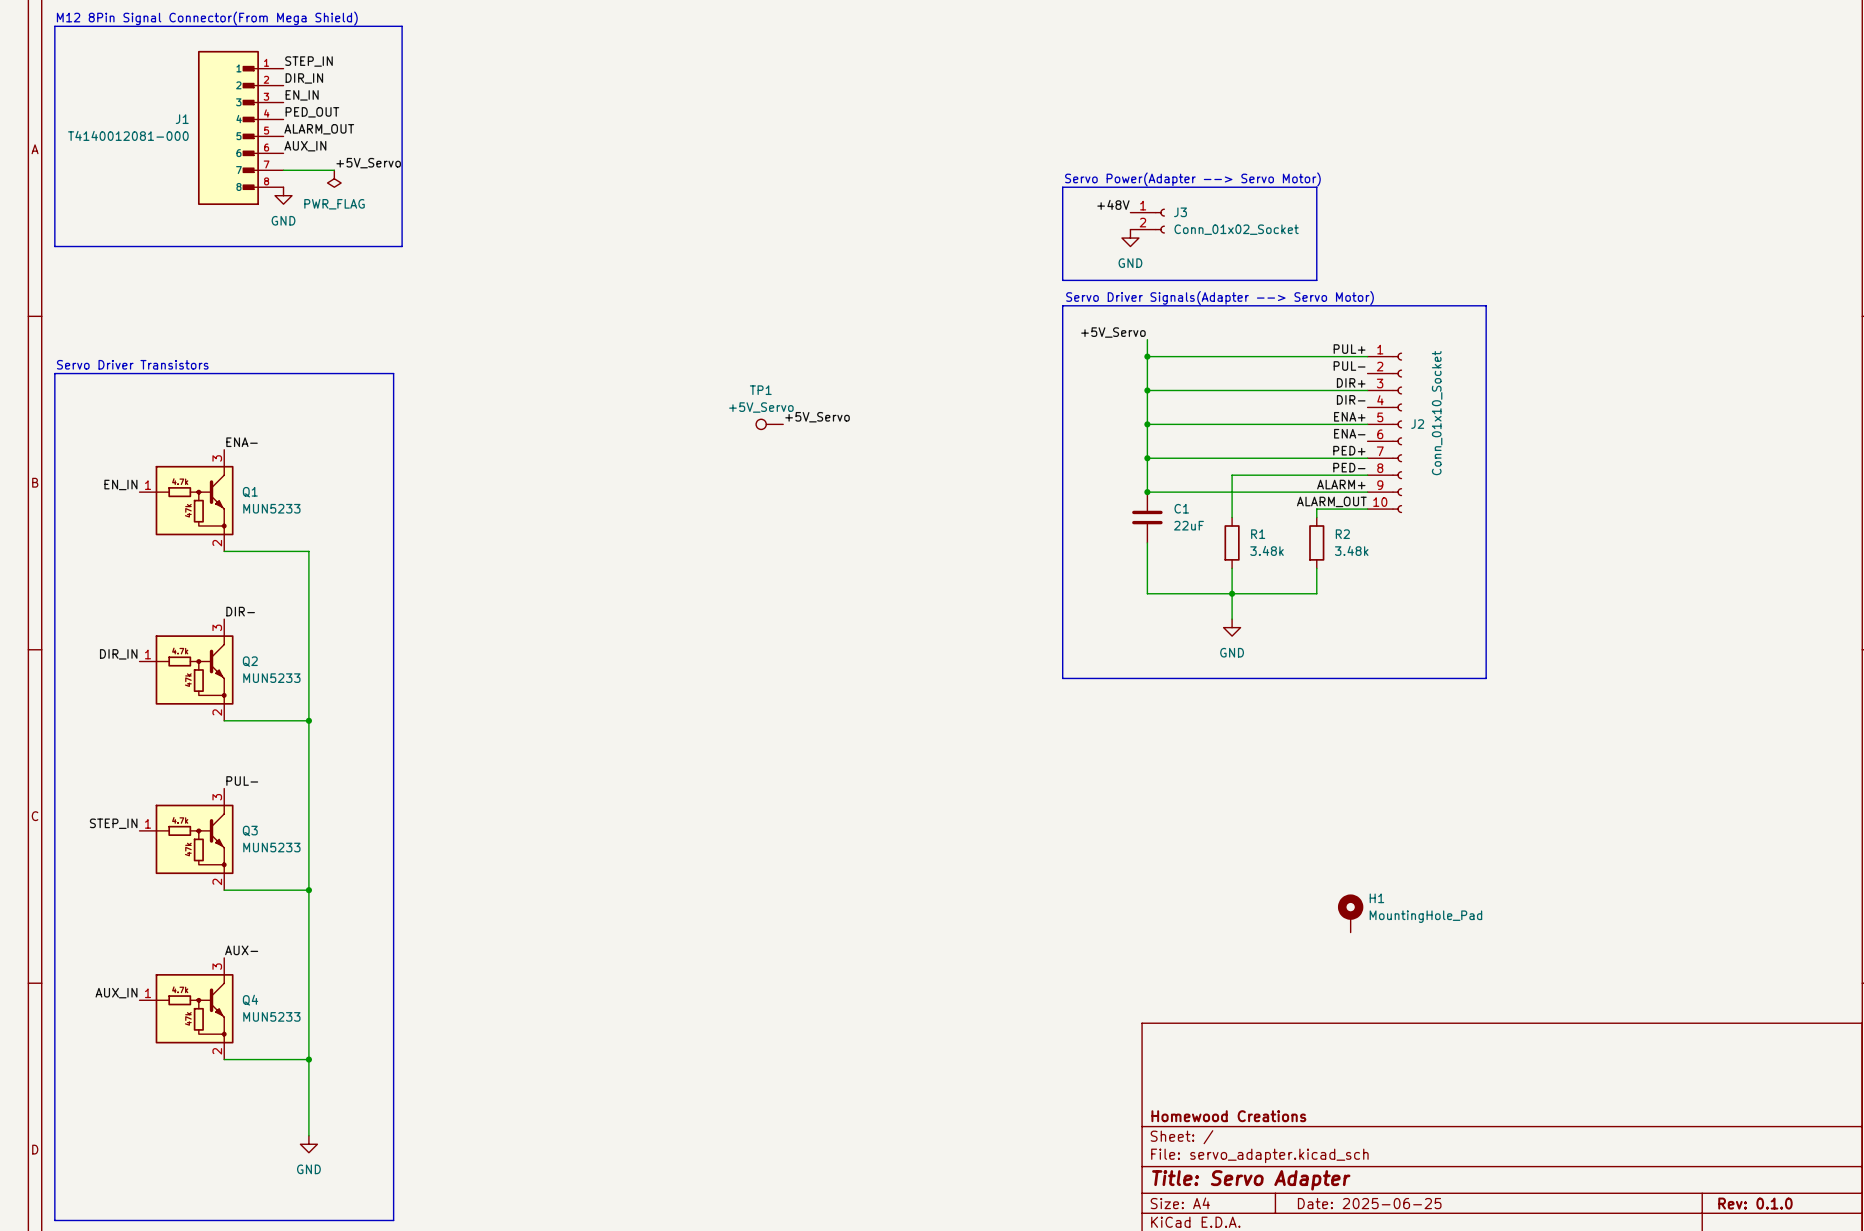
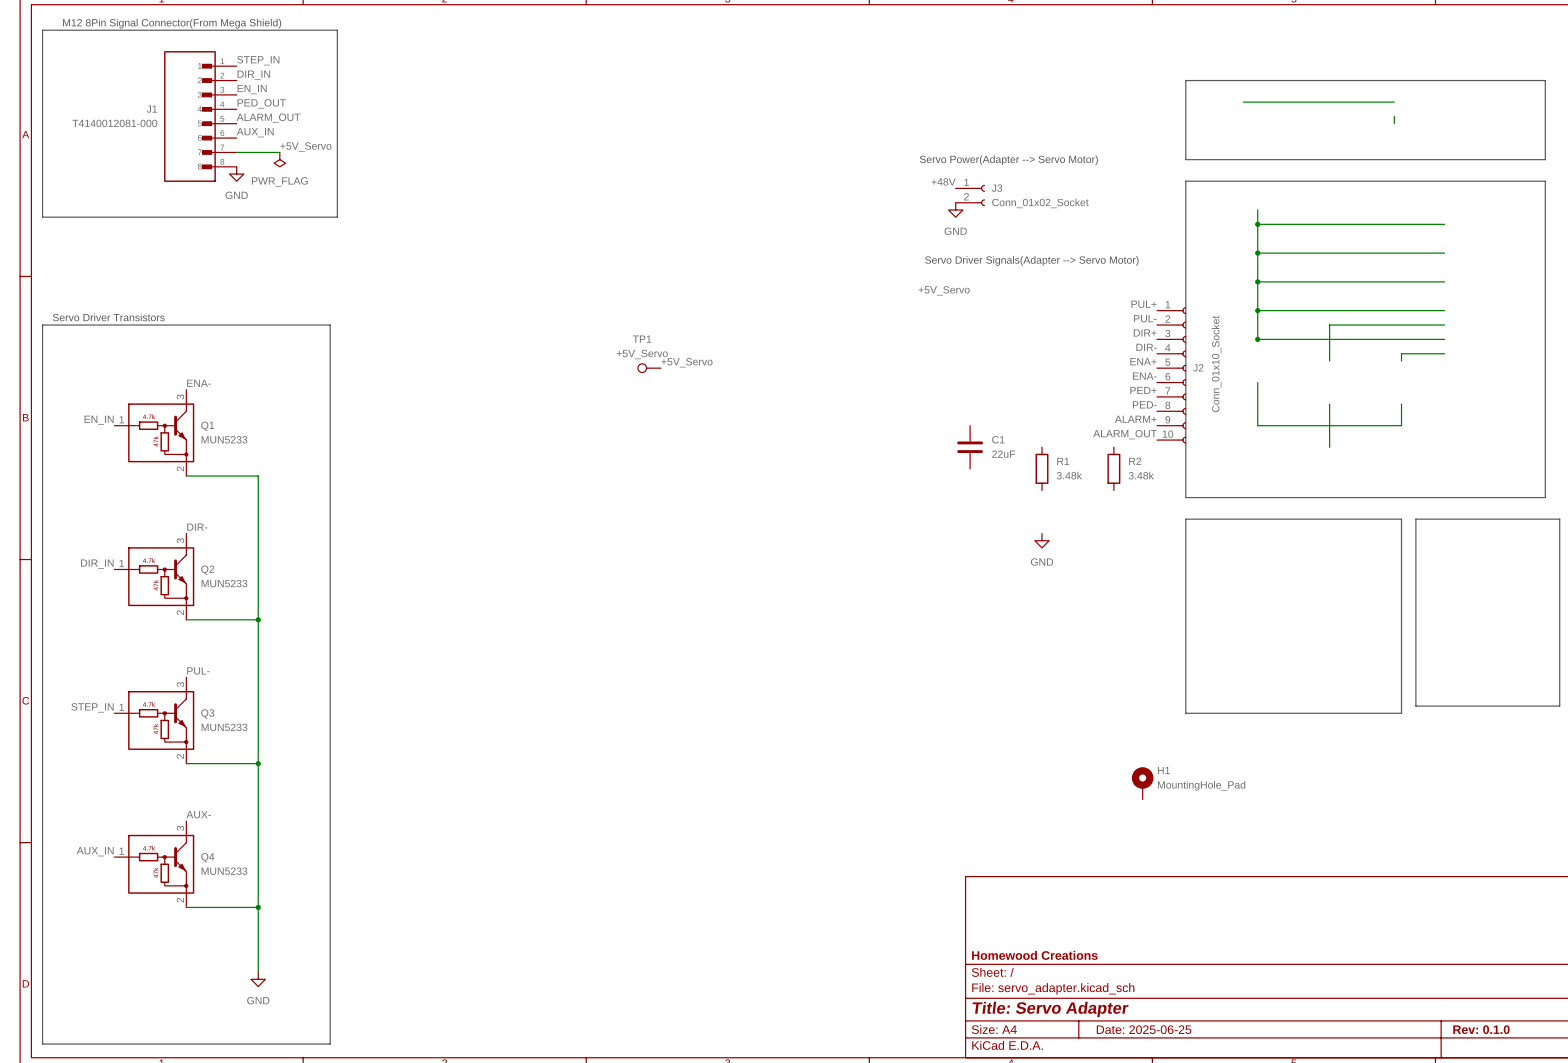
line: none -> (1185, 80) (1185, 159) (1545, 159) (1545, 80) (1185, 80)
wire: none -> (1243, 102) (1394, 102)
wire: none -> (1394, 116) (1394, 123)
line: (1062, 187) (1062, 280) (1316, 280) (1316, 187) (1062, 187) -> none
line: none -> (1185, 181) (1545, 181) (1545, 497) (1185, 497) (1185, 181)
wire: none -> (1257, 209) (1257, 339) (1444, 339)
wire: none -> (1257, 224) (1444, 224)
junction: none -> (1257, 224)
wire: none -> (1257, 253) (1444, 253)
junction: none -> (1257, 253)
line: (1062, 305) (1486, 305) (1486, 678) (1062, 678) (1062, 305) -> none
wire: none -> (1257, 281) (1444, 281)
junction: none -> (1257, 281)
wire: (1147, 339) (1147, 492) (1367, 492) -> none
wire: (1147, 356) (1367, 356) -> none
junction: (1147, 356) -> none
wire: none -> (1257, 310) (1444, 310)
junction: none -> (1257, 310)
wire: none -> (1444, 325) (1329, 325) (1329, 360)
wire: (1147, 390) (1367, 390) -> none
junction: (1147, 390) -> none
junction: none -> (1257, 339)
wire: none -> (1444, 353) (1401, 353) (1401, 360)
wire: (1147, 424) (1367, 424) -> none
junction: (1147, 424) -> none
wire: none -> (1257, 382) (1257, 425) (1401, 425) (1401, 404)
wire: (1147, 458) (1367, 458) -> none
junction: (1147, 458) -> none
wire: none -> (1329, 404) (1329, 447)
wire: (1367, 475) (1232, 475) (1232, 517) -> none
junction: (1147, 492) -> none
wire: (1367, 509) (1316, 509) (1316, 517) -> none
wire: (1147, 542) (1147, 593) (1316, 593) (1316, 568) -> none
wire: (1232, 568) (1232, 619) -> none
junction: (1232, 593) -> none
line: none -> (1185, 519) (1185, 713) (1401, 713) (1401, 519) (1185, 519)
line: none -> (1415, 519) (1559, 519) (1559, 706) (1415, 706) (1415, 519)

